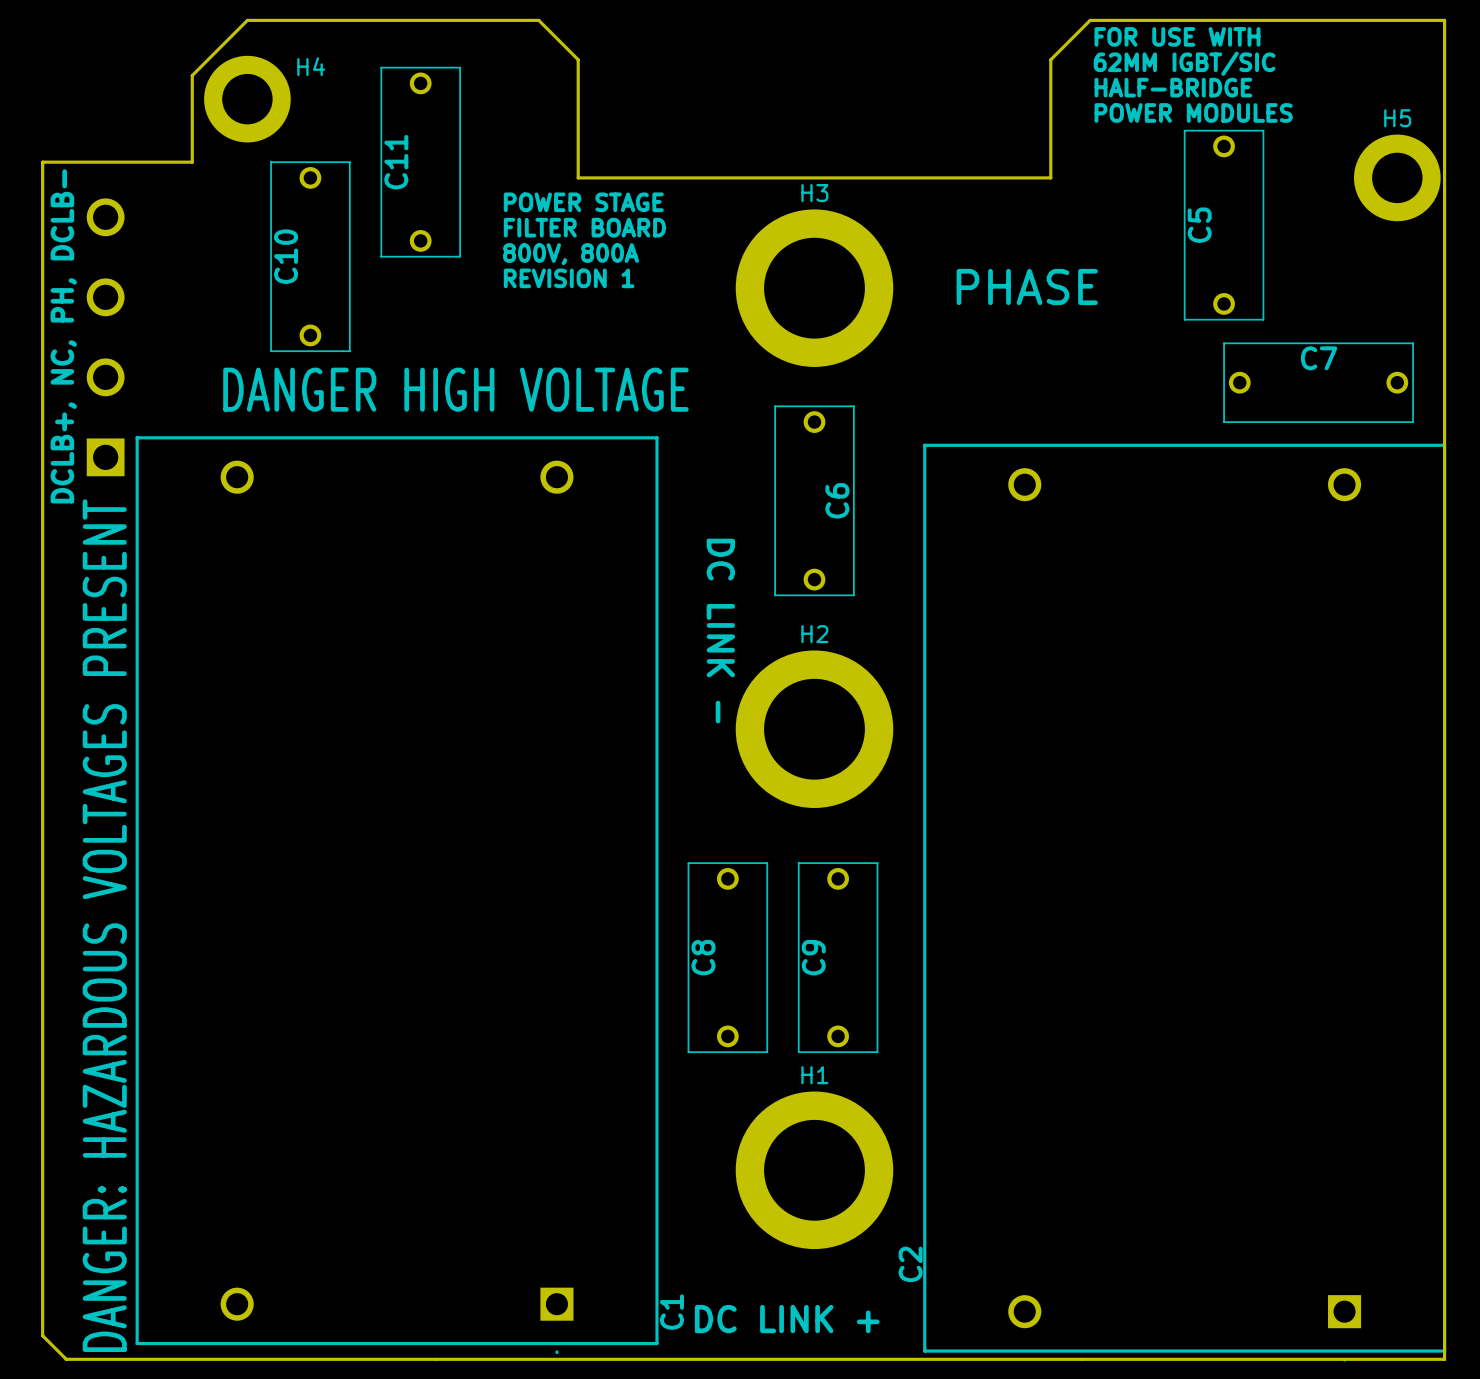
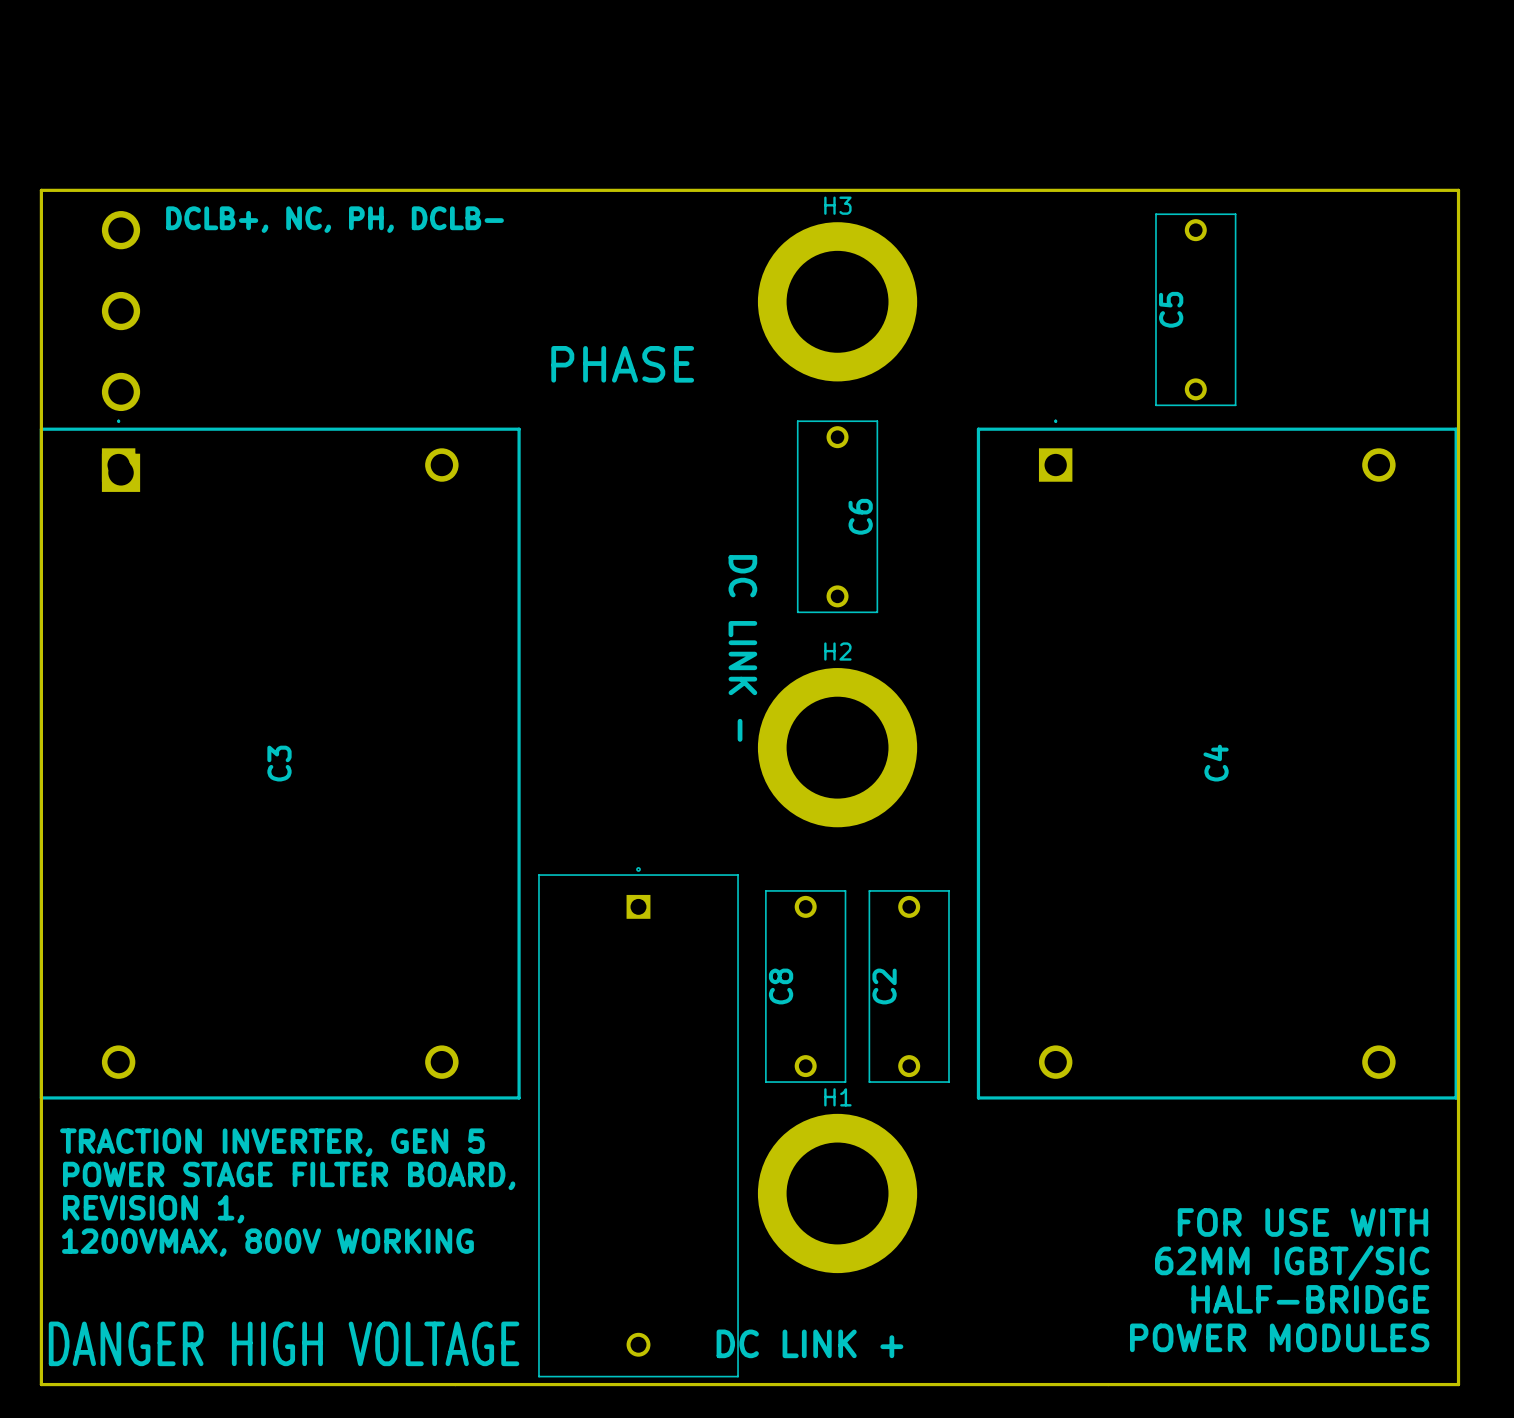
text: FOR USE WITH (1177, 36) -> none
text: 62MM IGBT/SIC (1184, 63) -> none
text: HALF-BRIDGE (1173, 87) -> none
H4: (247, 99) -> none
text: POWER MODULES (1193, 112) -> none
C11: (420, 162) -> none
board edge: (578, 177) (578, 59) (538, 20) (247, 20) (192, 75) (192, 162) (42, 162) (42, 1335) (66, 1359) -> (598, 190) (41, 190) (41, 1384) (81, 1384)
board edge: (1050, 177) (1050, 59) (1090, 20) (1444, 20) (1444, 1359) (1428, 1359) -> (1076, 190) (1458, 190) (1458, 1384)
H5: (1397, 177) -> none
text: POWER STAGE (583, 202) -> none
C5 position: (1224, 225) -> (1195, 309)
text: FILTER BOARD (584, 227) -> none
text: 800V, 800A (571, 254) -> none
C10: (310, 256) -> none
text: REVISION 1 (569, 278) -> none
text: PHASE (1027, 287) -> none
text rotation: 0° (63, 336) -> 90° clockwise (335, 219)
text: none -> PHASE (622, 364)
C7: (1318, 382) -> none
text: DANGER HIGH VOLTAGE (455, 389) -> none
C2 footprint: [923, 443, 1447, 1362] -> [868, 890, 950, 1083]
C3: none -> (280, 759)
C4: none -> (1217, 759)
C1: (397, 895) -> none
text: DANGER: HAZARDOUS VOLTAGES PRESENT (104, 925) -> DANGER HIGH VOLTAGE (284, 1343)
C8 position: (727, 957) -> (805, 986)
C9: (838, 957) -> none
part: none -> (638, 1122)
text: none -> TRACTION INVERTER, GEN 5 (272, 1142)
text: none -> POWER STAGE FILTER BOARD, (289, 1175)
text: none -> REVISION 1, (153, 1209)
text: none -> FOR USE WITH (1302, 1222)
text: none -> 1200VMAX, 800V WORKING (267, 1242)
text: none -> 62MM IGBT/SIC (1292, 1263)
C2 name position: C2 (910, 1264) -> C2 (884, 986)
text: none -> HALF-BRIDGE (1310, 1299)
text: none -> POWER MODULES (1279, 1337)

